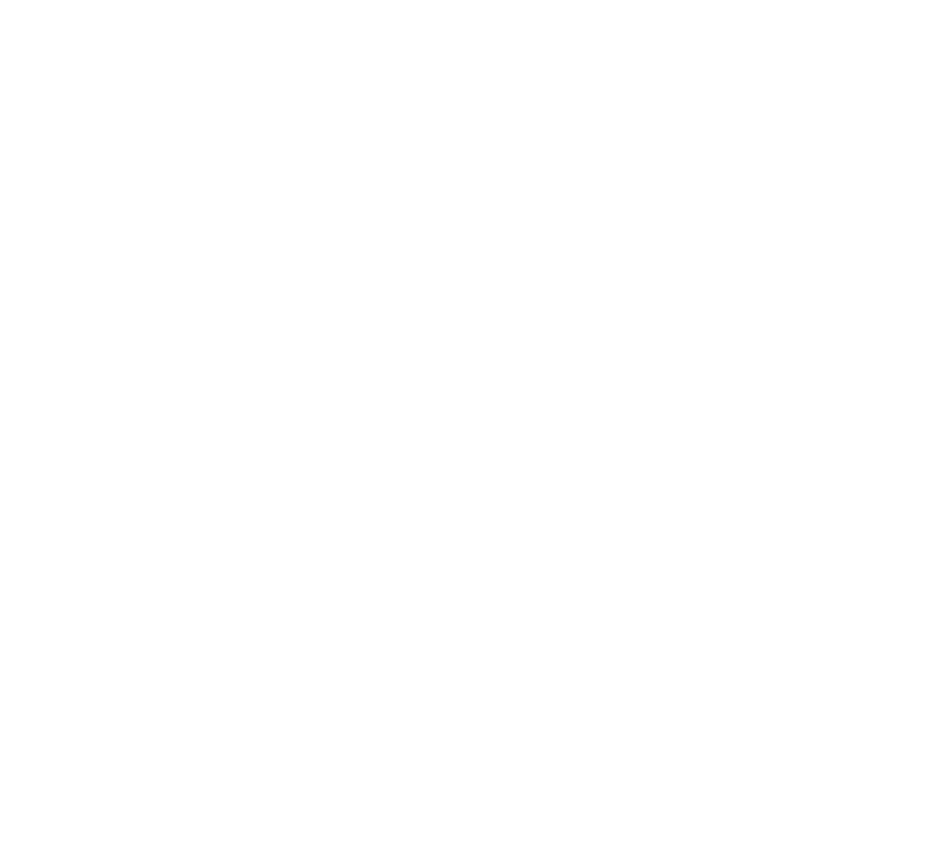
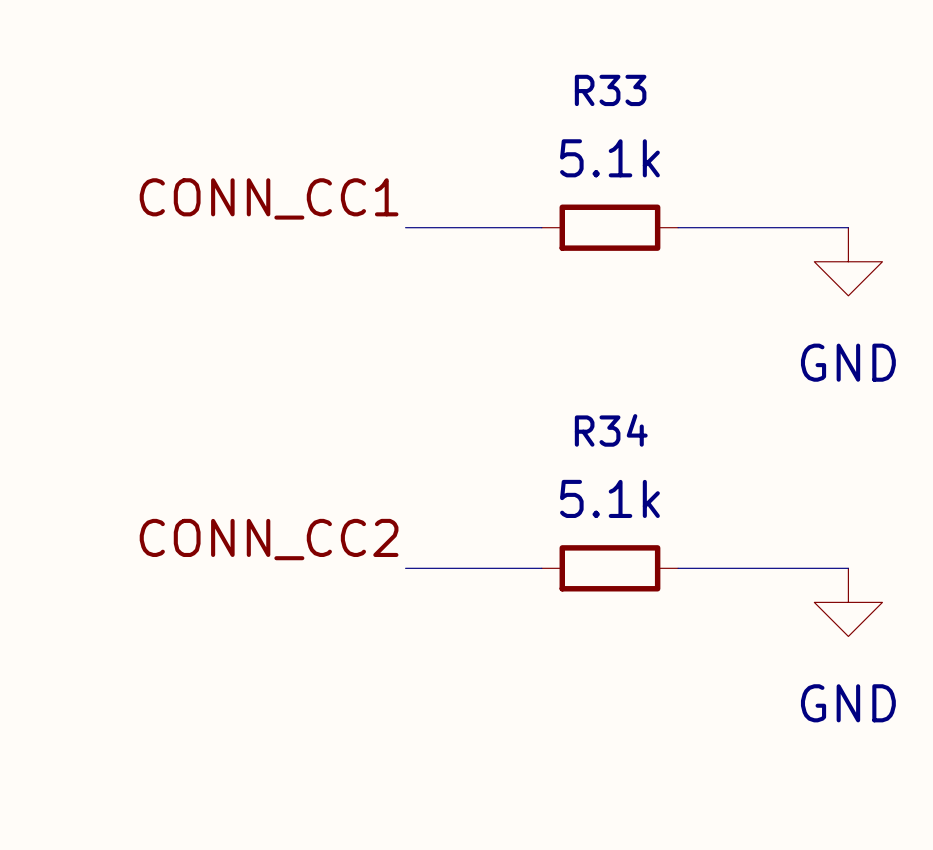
label: none -> CONN_CC1 (269, 198)
wire: none -> (405, 227) (541, 227)
R33: none -> 5.1k (609, 227)
wire: none -> (678, 227) (848, 227)
power symbol: none -> GND (848, 261)
label: none -> CONN_CC2 (269, 539)
wire: none -> (405, 568) (541, 568)
R34: none -> 5.1k (609, 568)
wire: none -> (678, 568) (848, 568)
power symbol: none -> GND (848, 602)

